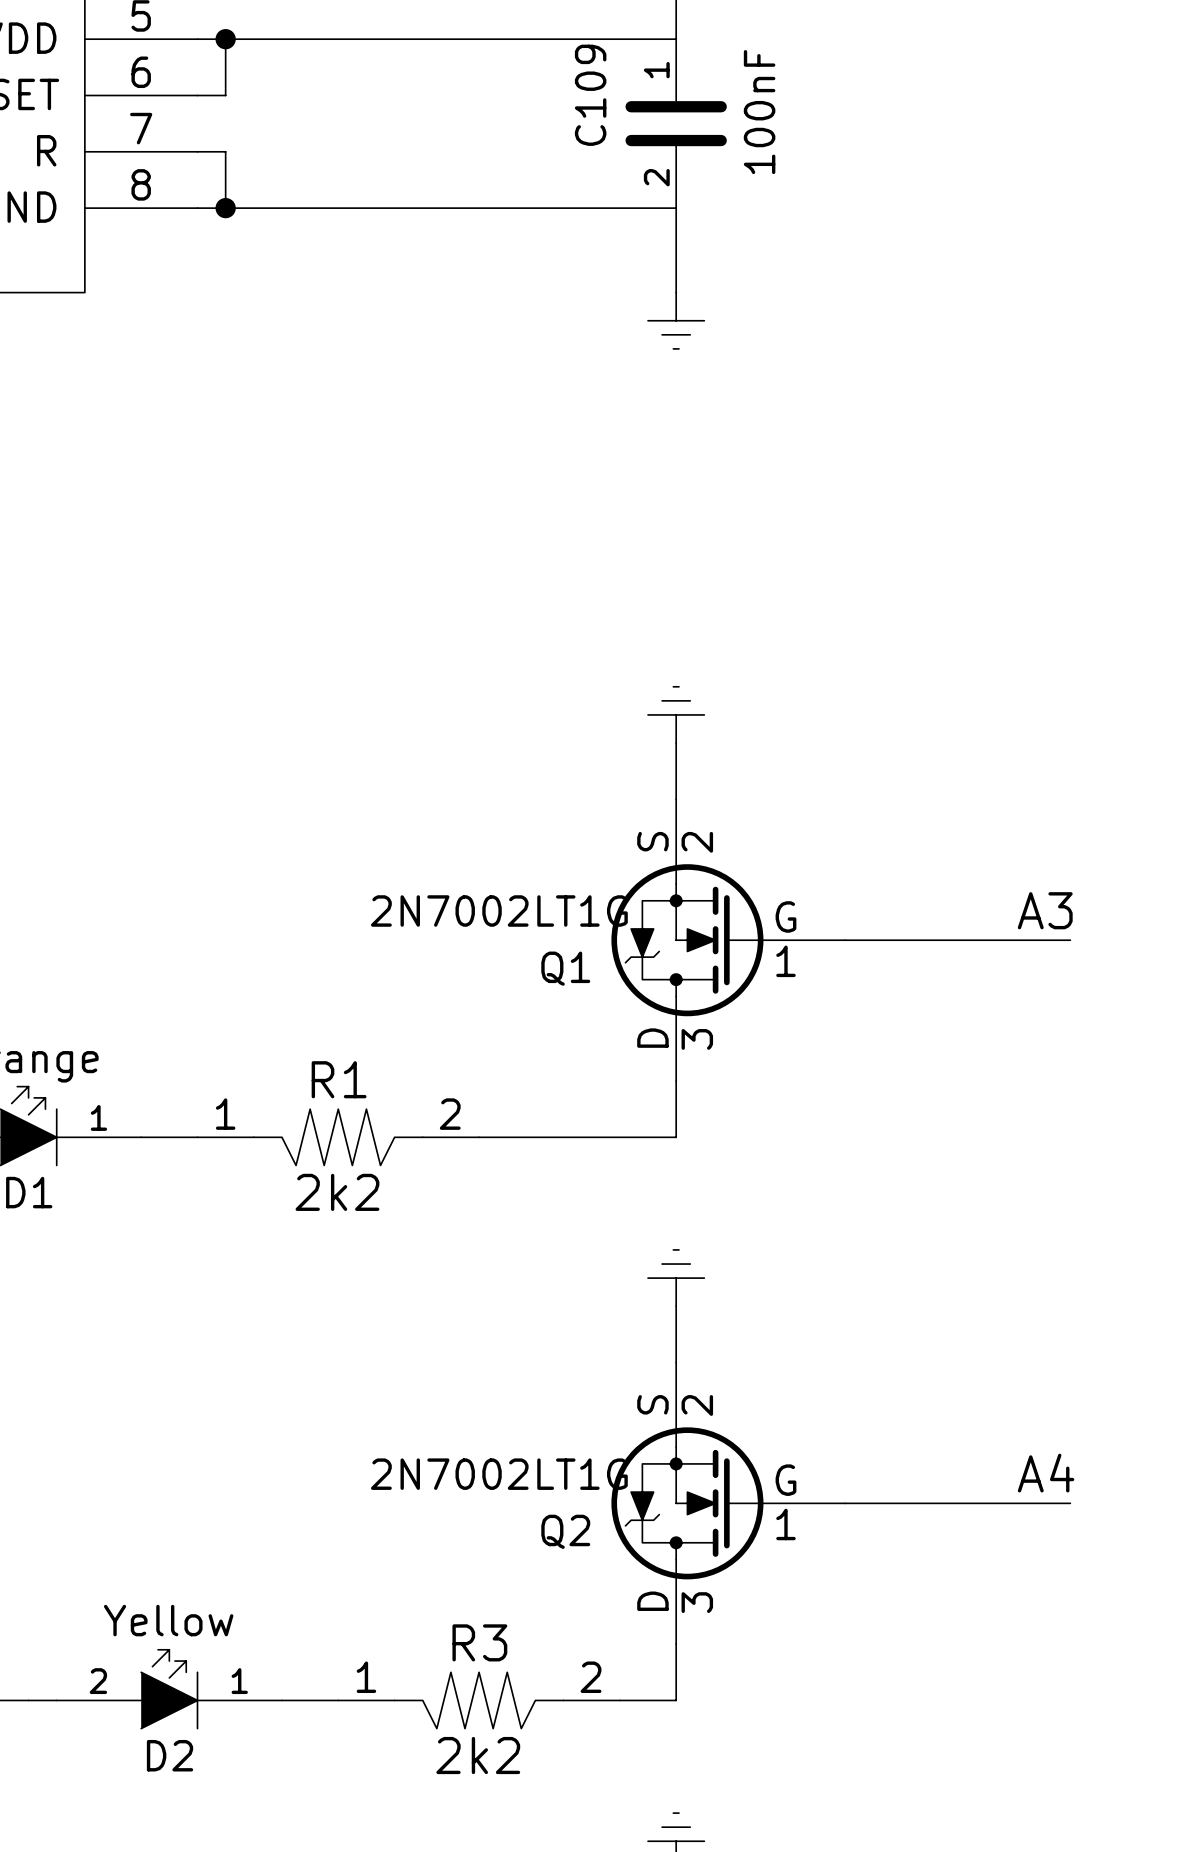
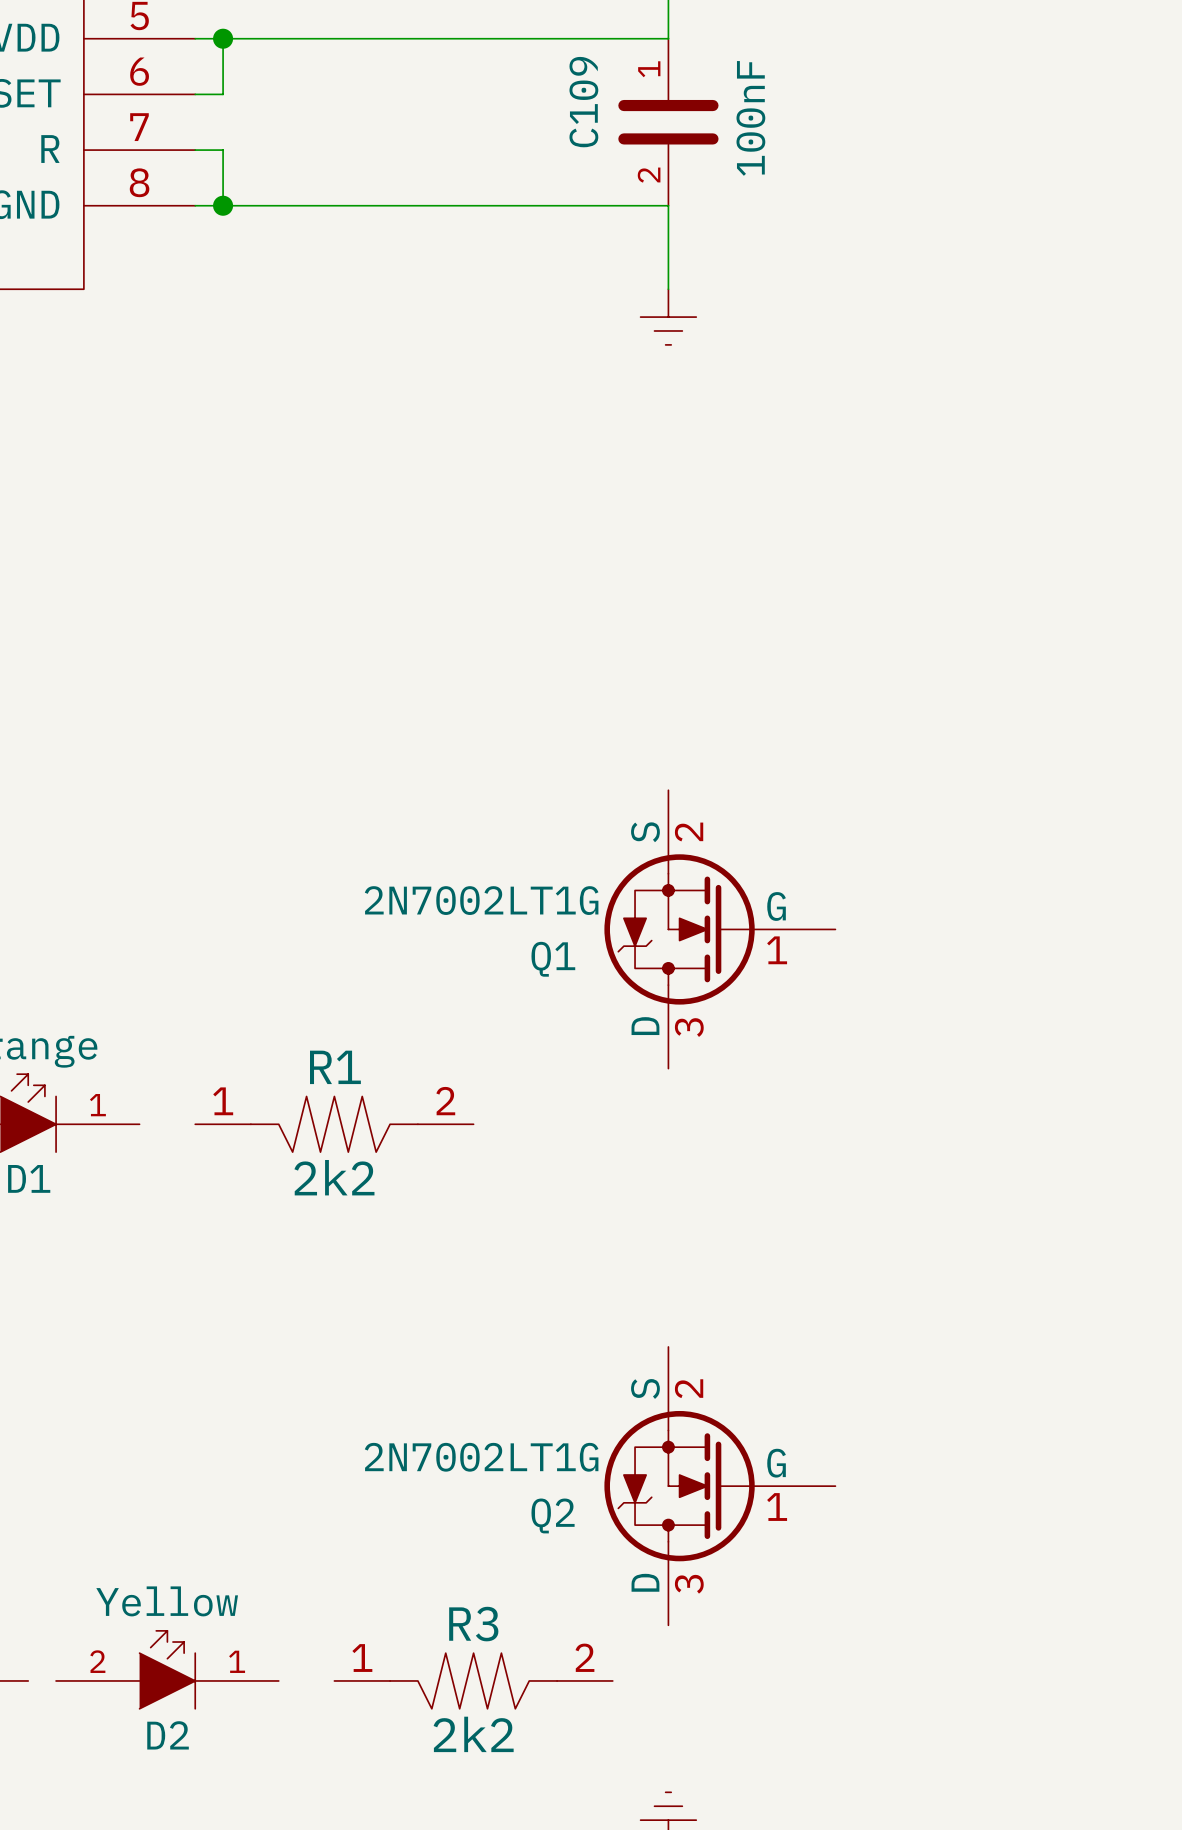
power symbol: (676, 714) -> none
wire: (676, 743) (676, 799) -> none
label: A3 (1045, 910) -> none
wire: (845, 940) (1070, 940) -> none
wire: (676, 1081) (676, 1137) (479, 1137) -> none
wire: (141, 1137) (197, 1137) -> none
power symbol: (676, 1278) -> none
wire: (676, 1306) (676, 1362) -> none
label: A4 (1046, 1473) -> none
wire: (845, 1503) (1070, 1503) -> none
wire: (676, 1644) (676, 1700) (619, 1700) -> none
wire: (28, 1700) (56, 1700) -> none
wire: (281, 1700) (338, 1700) -> none

